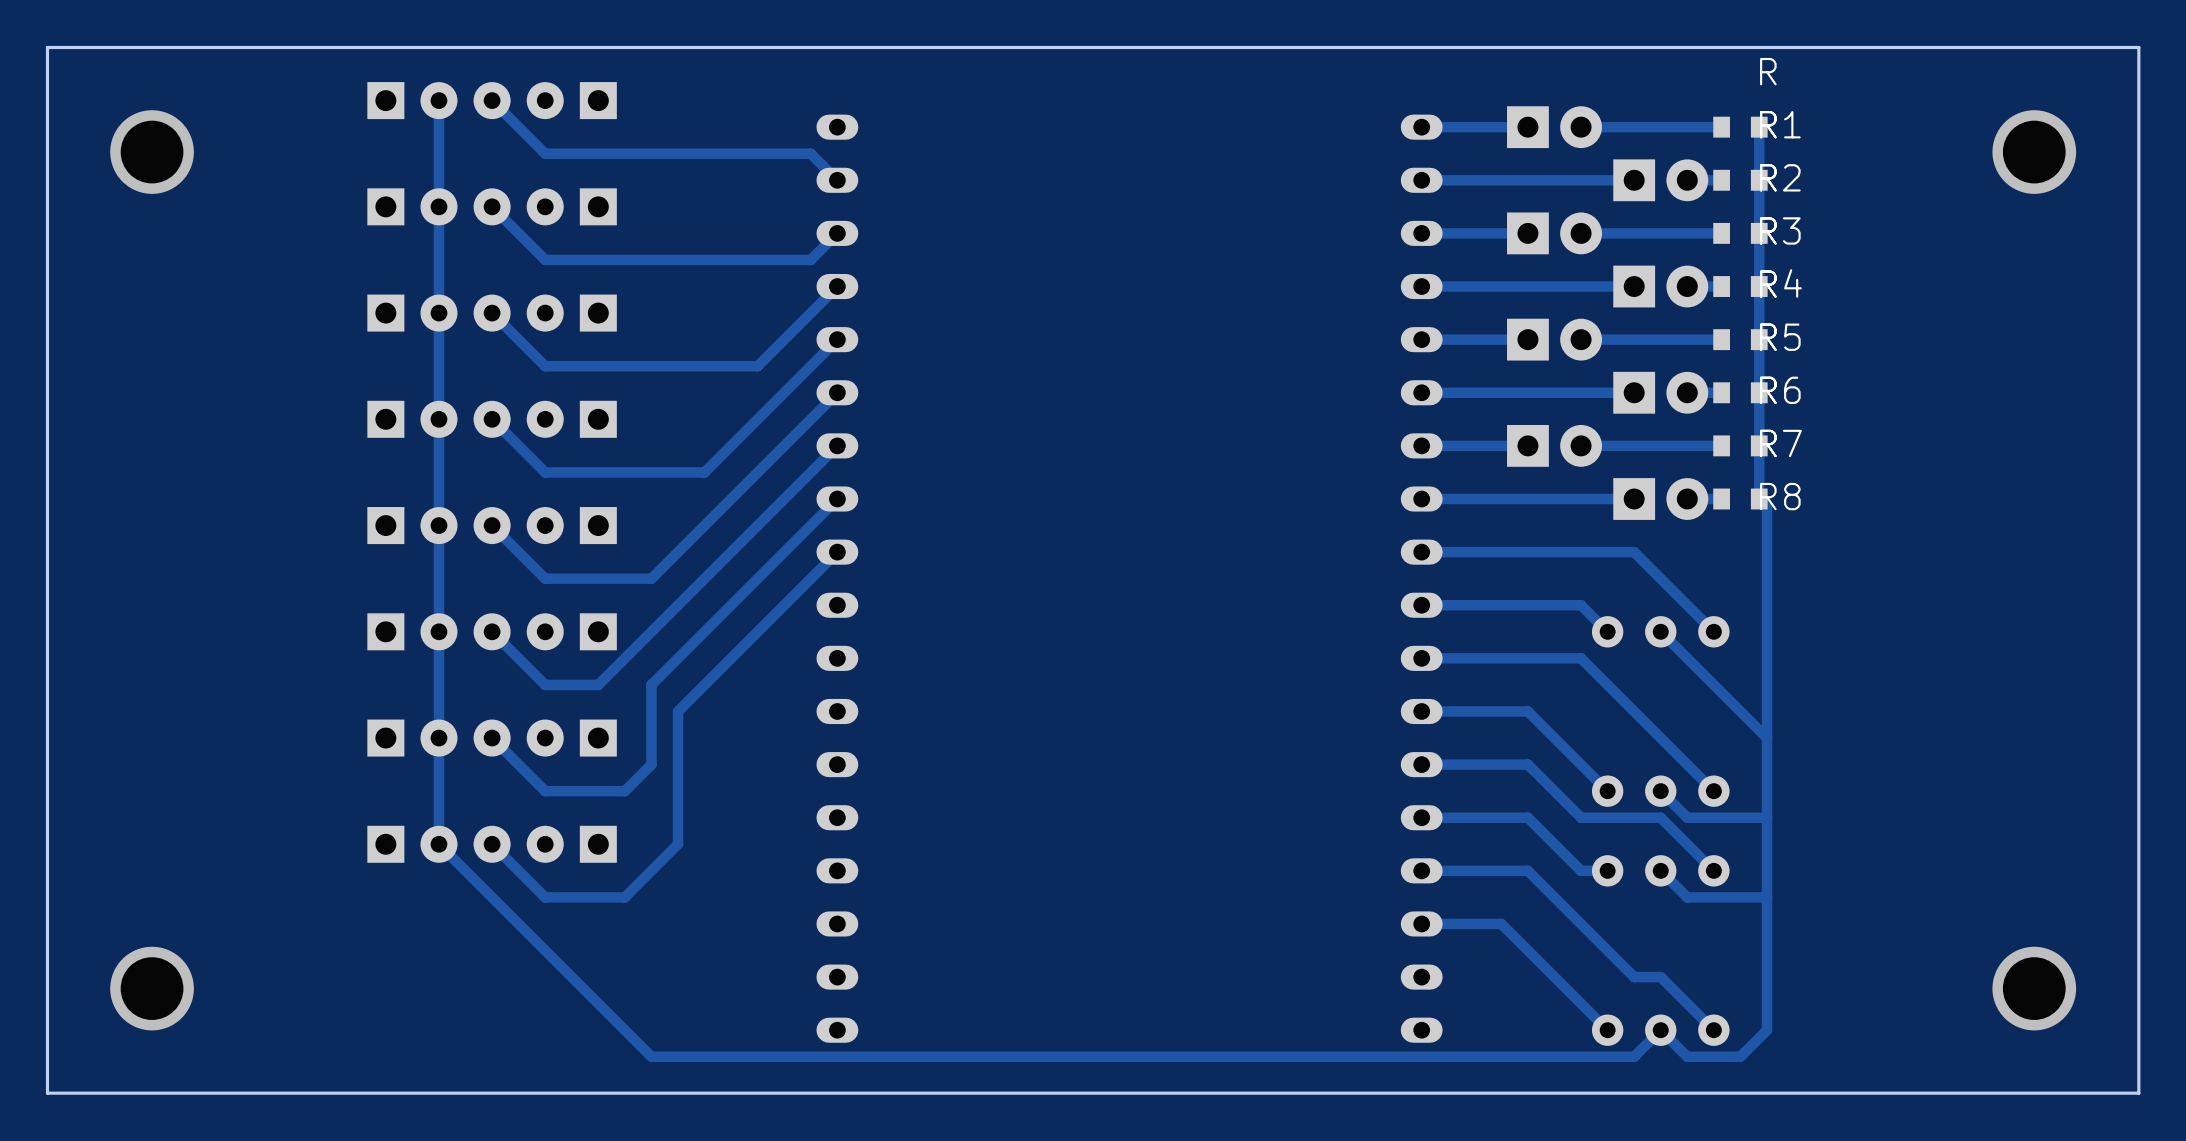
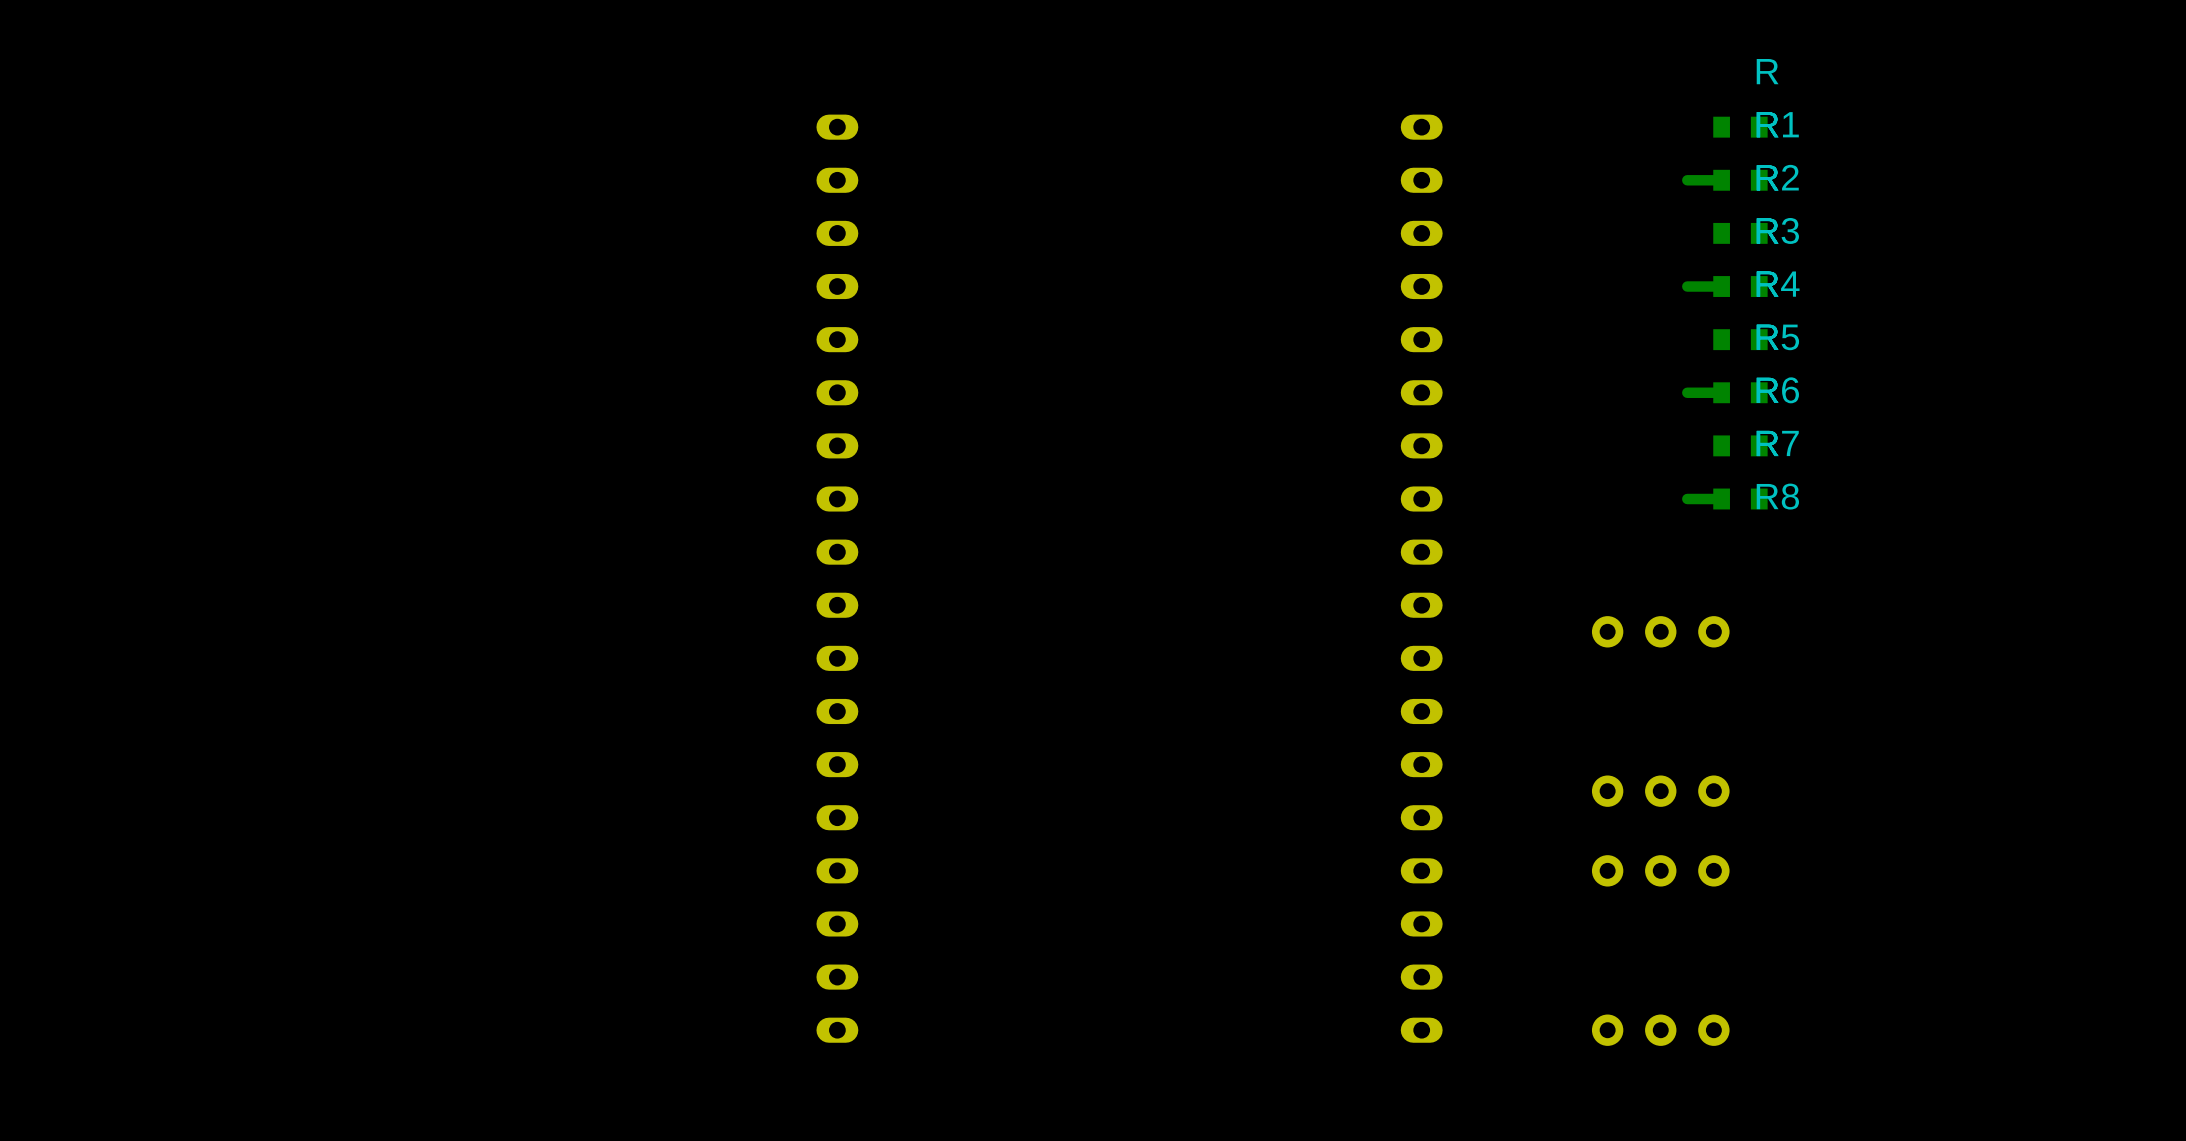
board edge: (2138, 47) (47, 47) (47, 1093) (2138, 1093) (2138, 47) -> none
track: (438, 100) (438, 844) (651, 1056) (1634, 1056) (1660, 1030) (1687, 1056) (1740, 1056) (1767, 1030) (1767, 506) (1759, 499) (1759, 127) -> none
track: (492, 100) (545, 153) (810, 153) (837, 180) -> none
part: (492, 100) -> none
track: (1527, 127) (1421, 127) -> none
part: (1554, 127) -> none
track: (1721, 127) (1581, 127) -> none
via: (152, 152) -> none
via: (2034, 152) -> none
track: (1634, 180) (1421, 180) -> none
part: (1660, 180) -> none
track: (492, 206) (545, 259) (810, 259) (837, 233) -> none
part: (492, 206) -> none
track: (1527, 233) (1421, 233) -> none
part: (1554, 233) -> none
track: (1721, 233) (1581, 233) -> none
track: (837, 286) (757, 366) (545, 366) (492, 313) -> none
track: (1634, 286) (1421, 286) -> none
part: (1660, 286) -> none
part: (492, 313) -> none
track: (837, 339) (704, 472) (545, 472) (492, 419) -> none
track: (1527, 339) (1421, 339) -> none
part: (1554, 339) -> none
track: (1721, 339) (1581, 339) -> none
track: (837, 392) (651, 578) (545, 578) (492, 525) -> none
track: (1634, 392) (1421, 392) -> none
part: (1660, 392) -> none
part: (492, 419) -> none
track: (837, 445) (598, 684) (545, 684) (492, 631) -> none
track: (1527, 445) (1421, 445) -> none
part: (1554, 445) -> none
track: (1721, 445) (1581, 445) -> none
track: (837, 499) (651, 684) (651, 764) (624, 791) (545, 791) (492, 738) -> none
track: (1634, 499) (1421, 499) -> none
part: (1660, 499) -> none
part: (492, 525) -> none
track: (837, 552) (678, 711) (678, 844) (624, 897) (545, 897) (492, 844) -> none
track: (1421, 552) (1634, 552) (1713, 631) -> none
track: (1421, 605) (1581, 605) (1607, 631) -> none
part: (492, 631) -> none
track: (1660, 631) (1767, 738) -> none
track: (1421, 658) (1581, 658) (1713, 791) -> none
track: (1421, 711) (1527, 711) (1607, 791) -> none
part: (492, 738) -> none
track: (1421, 764) (1527, 764) (1581, 817) (1660, 817) (1713, 870) -> none
track: (1660, 791) (1687, 817) (1767, 817) -> none
track: (1421, 817) (1527, 817) (1581, 870) (1607, 870) -> none
part: (492, 844) -> none
track: (1421, 870) (1527, 870) (1634, 977) (1660, 977) (1713, 1030) -> none
track: (1660, 870) (1687, 897) (1767, 897) -> none
track: (1421, 923) (1501, 923) (1607, 1030) -> none
via: (152, 988) -> none
via: (2034, 988) -> none

